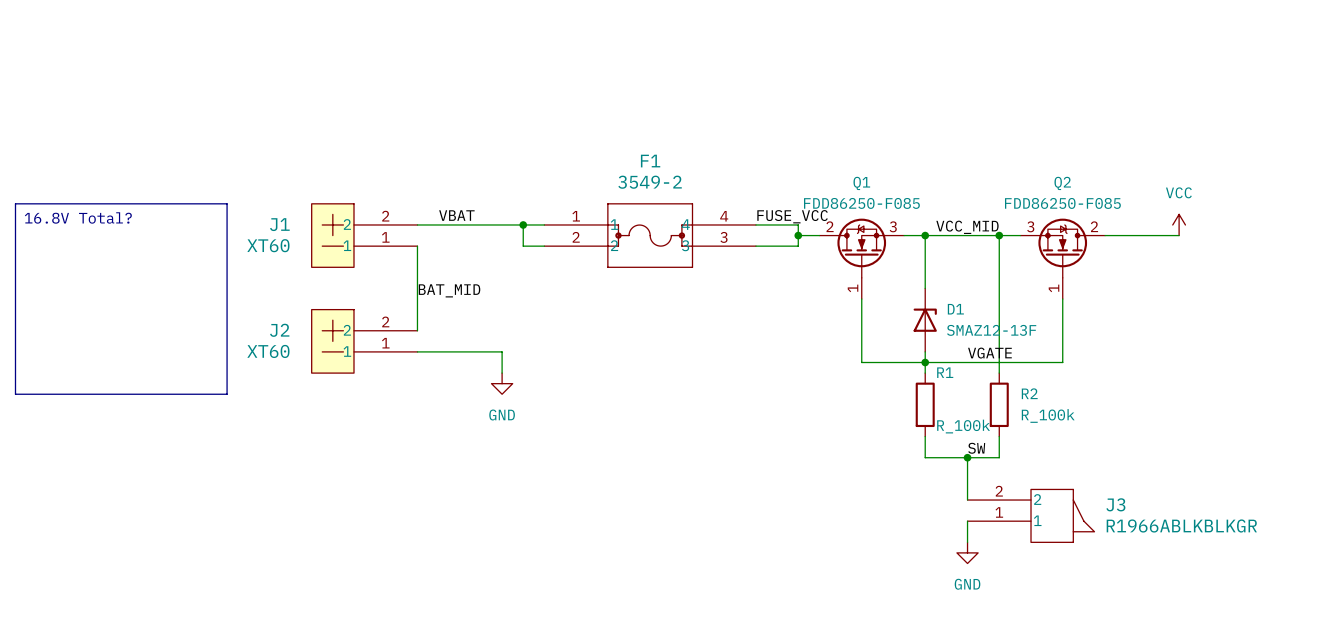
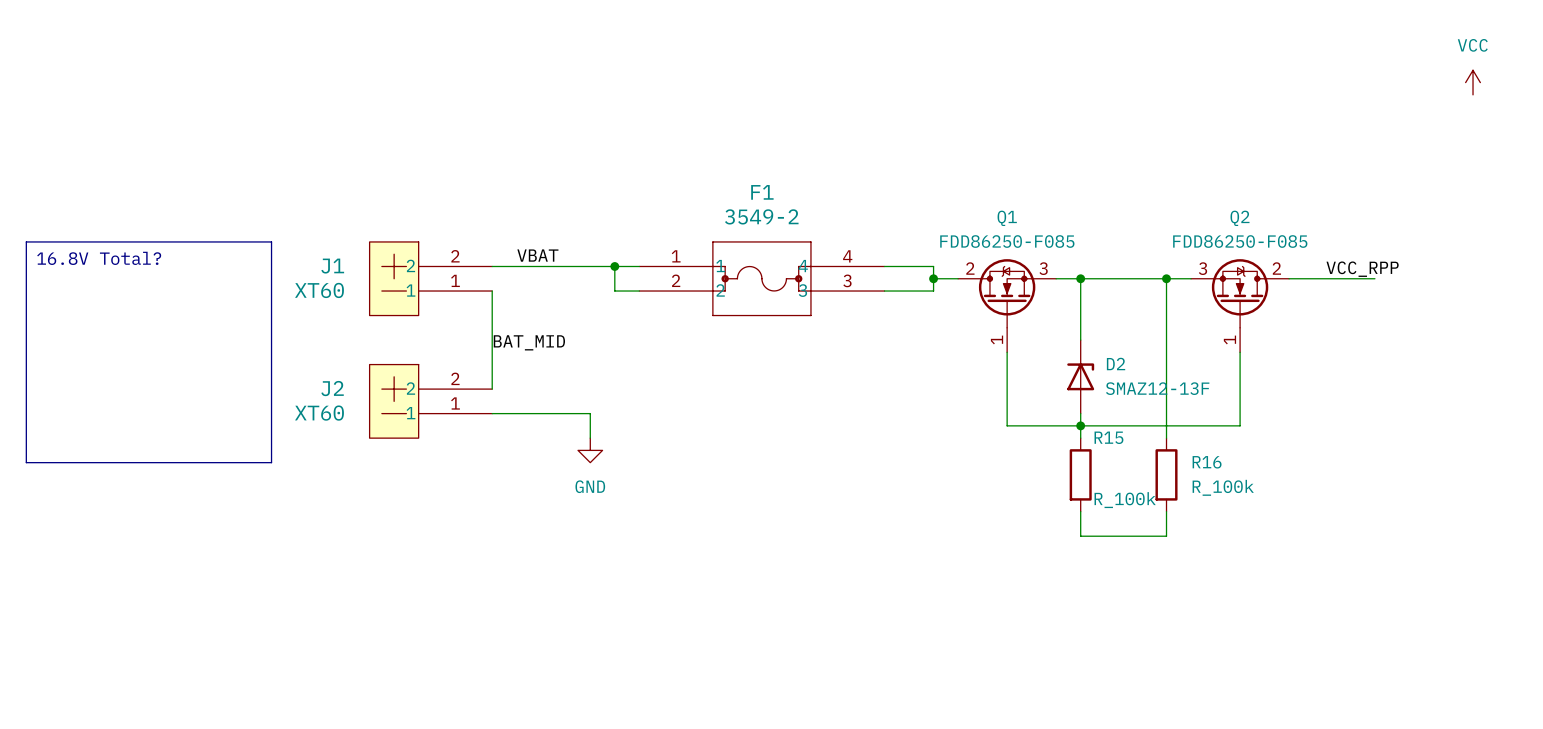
label: FUSE_VCC (792, 216) -> none
power symbol position: VCC (1179, 224) -> VCC (1473, 82)
label: VCC_MID (967, 227) -> none
label: none -> VCC_RPP (1362, 269)
D1 name: D1 (955, 309) -> D2 (1116, 364)
label: VGATE (989, 353) -> none
R1 name: R1 (945, 372) -> R15 (1108, 437)
R2 name: R2 (1029, 393) -> R16 (1207, 462)
label: SW (976, 448) -> none
wire: (967, 457) (967, 500) -> none
junction: (967, 457) -> none
J3: R1966ABLKBLKGR (1031, 515) -> none
wire: (967, 521) (967, 542) -> none
power symbol: GND (967, 552) -> none

